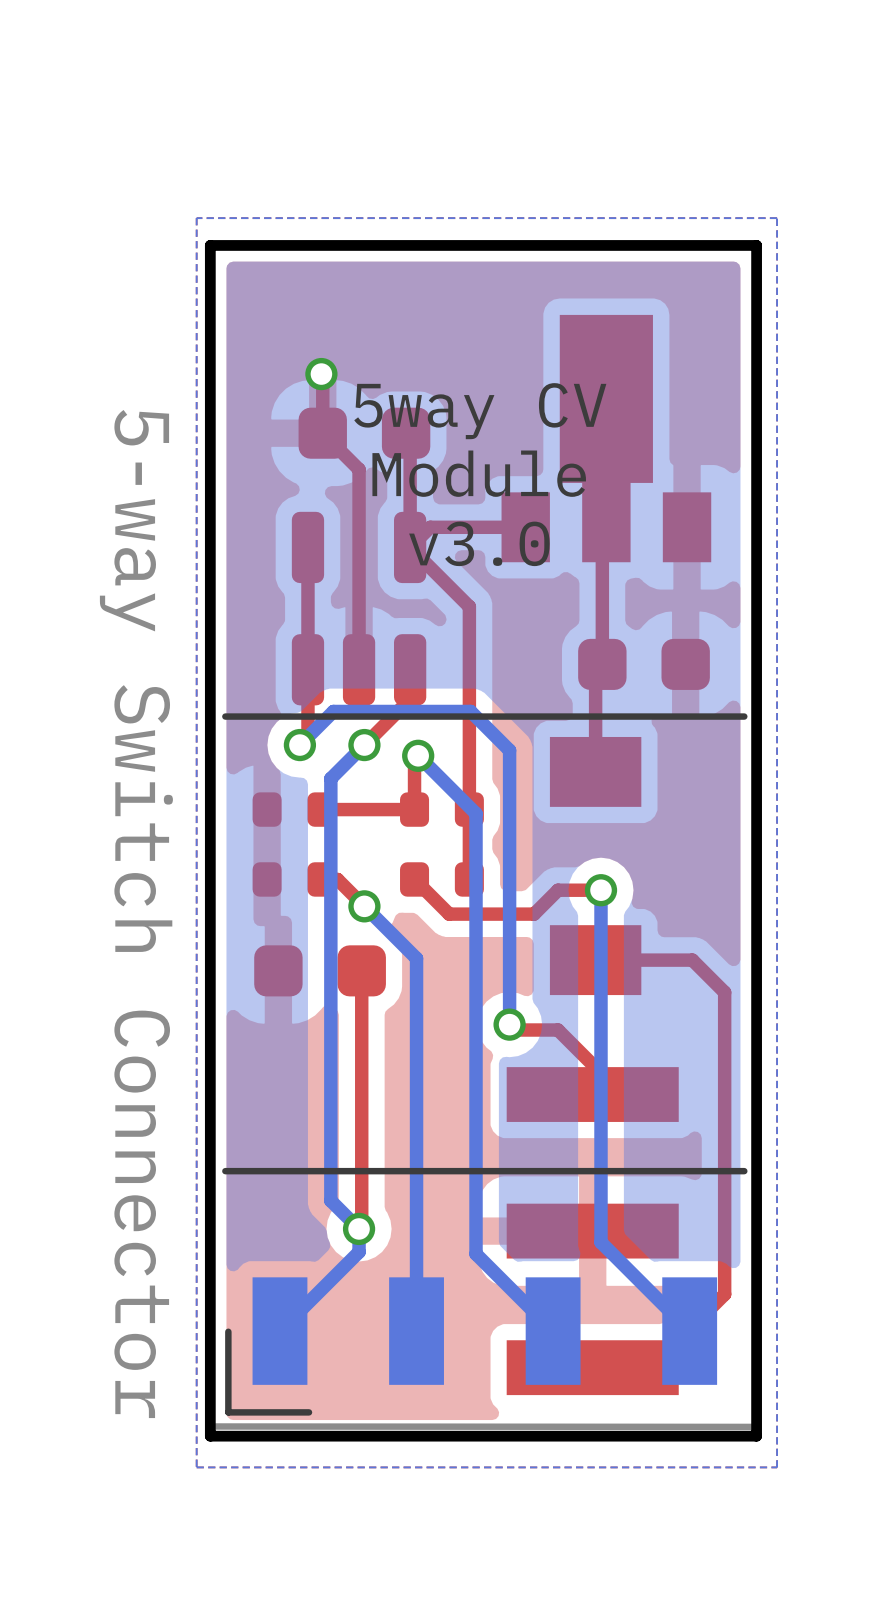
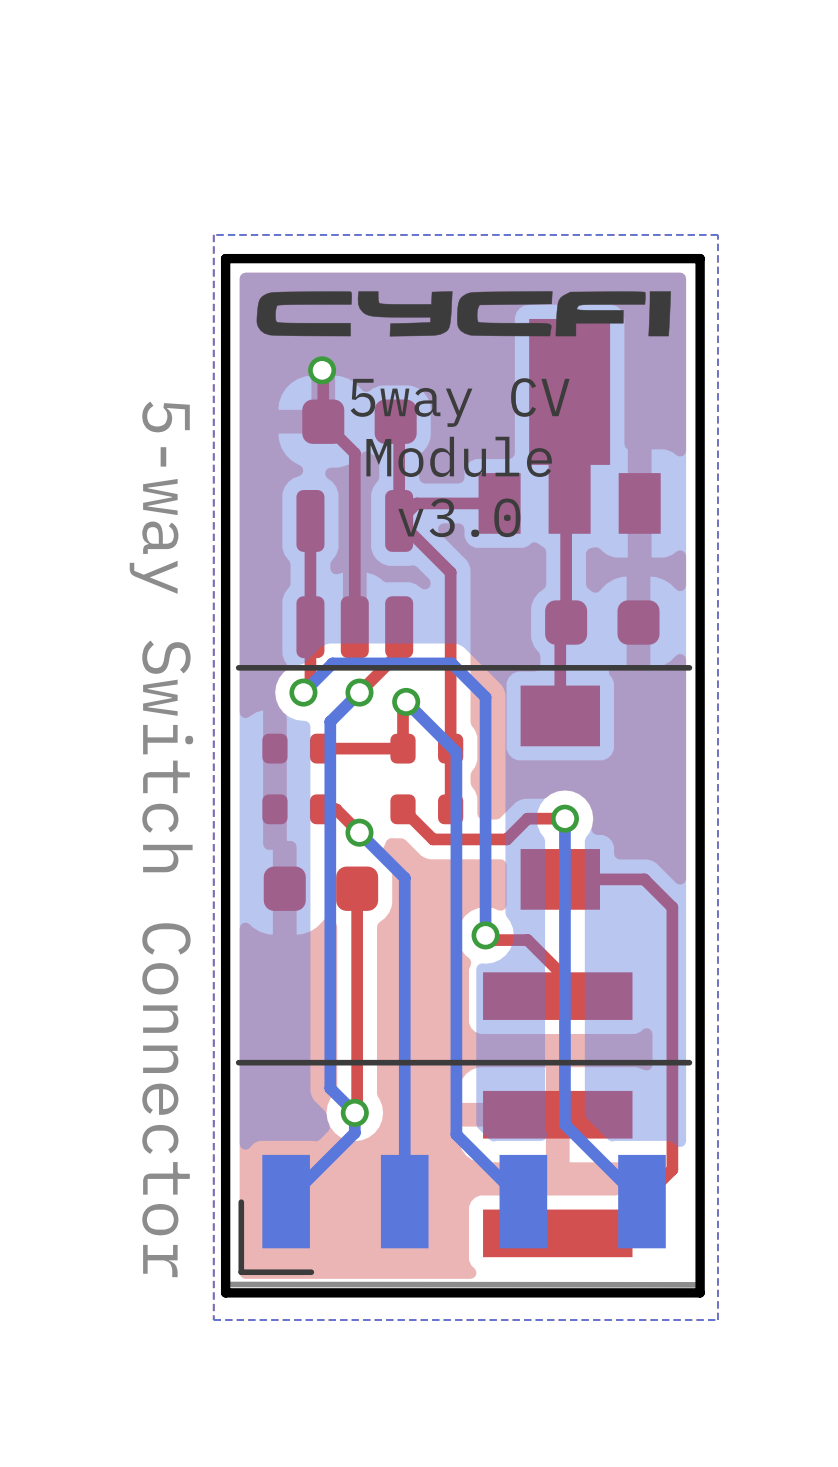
drawing: none -> [256, 291, 671, 337]

